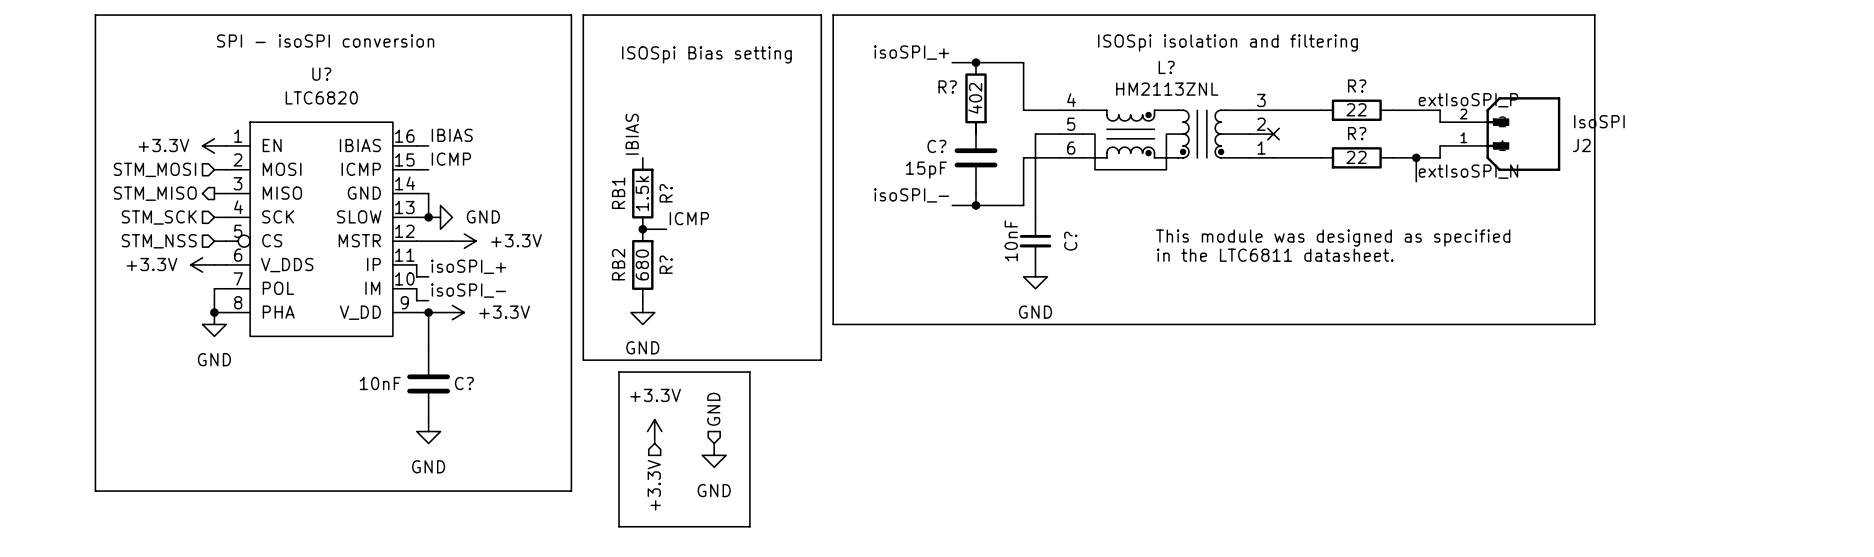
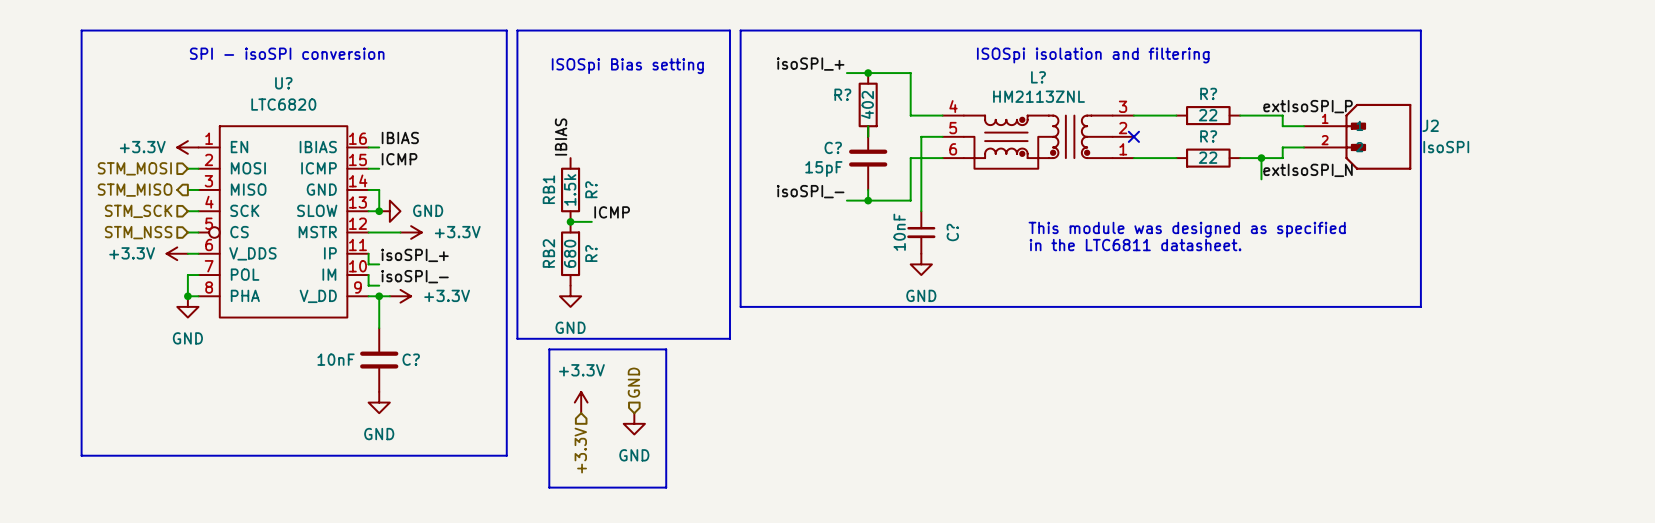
J2 flip: as is (1523, 134) -> up-down (1378, 136)

